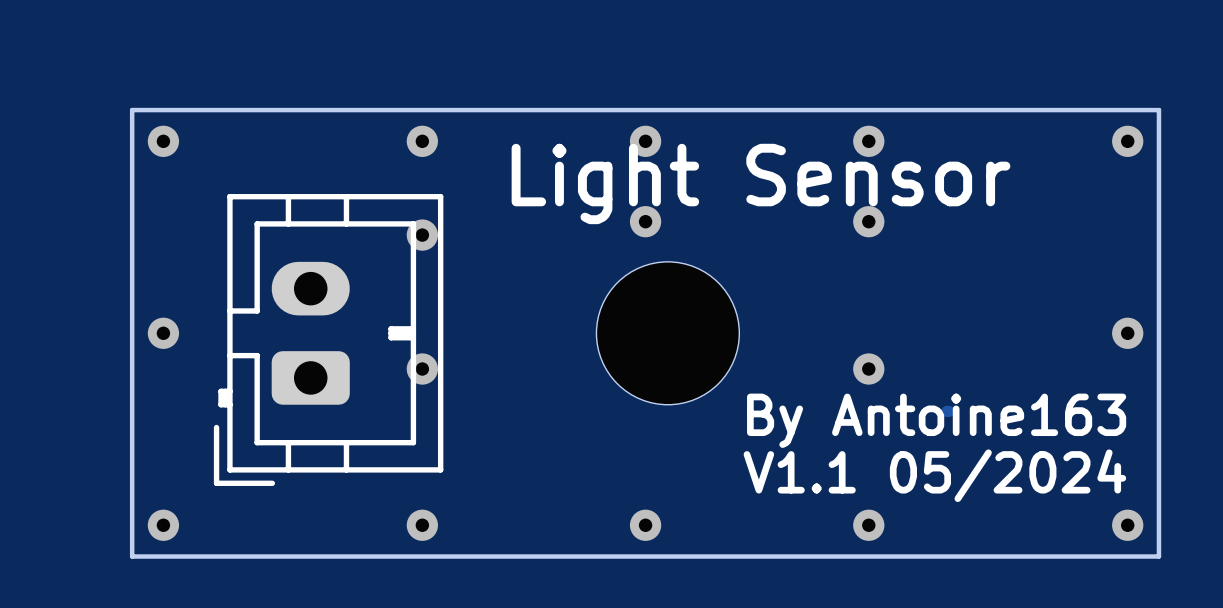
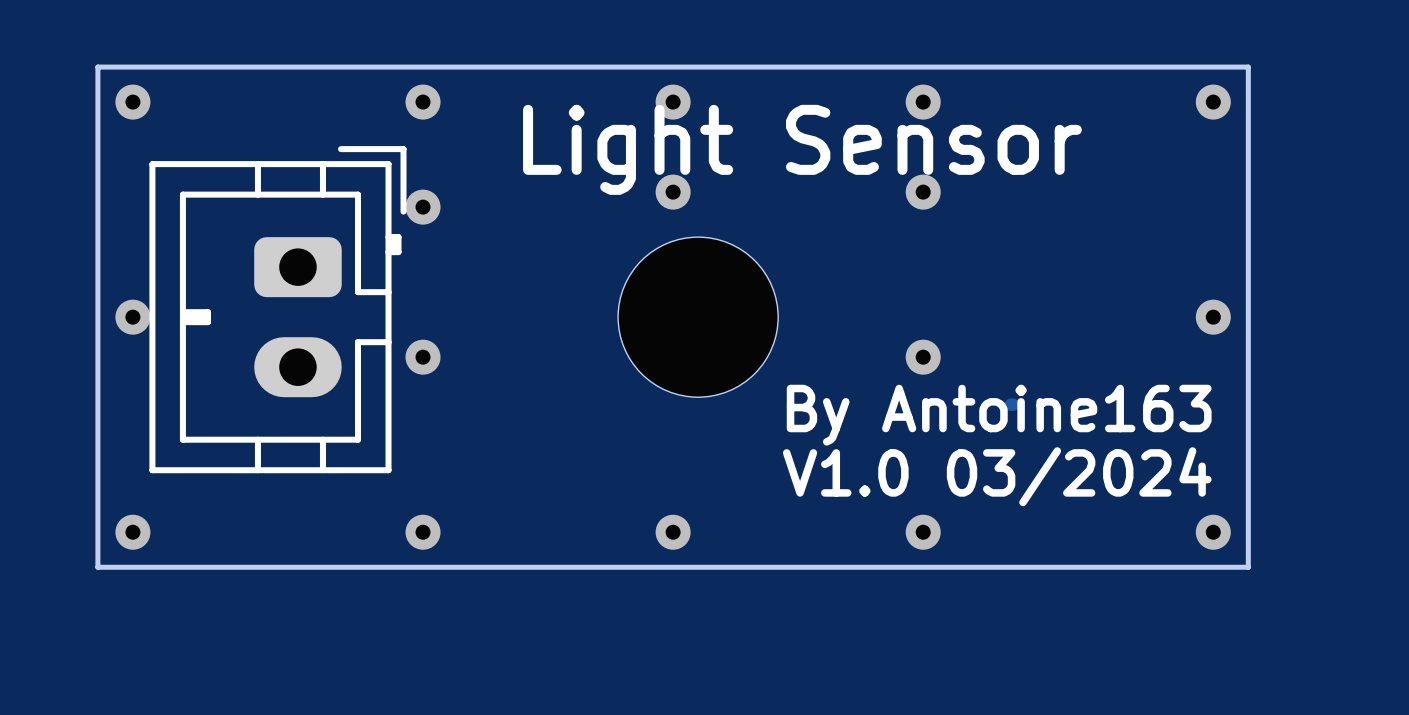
part rotation: 0° (328, 339) -> 180° (277, 309)
text: V1.1 05/2024 (934, 475) -> V1.0 03/2024 (997, 476)

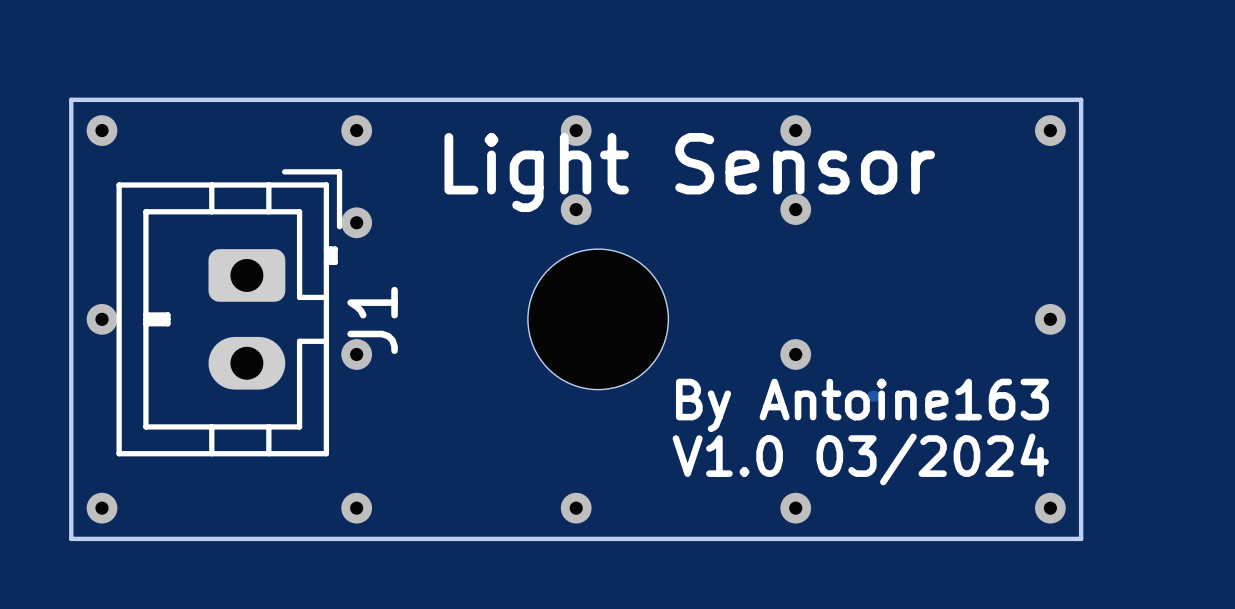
J1 name: none -> J1 (372, 320)

